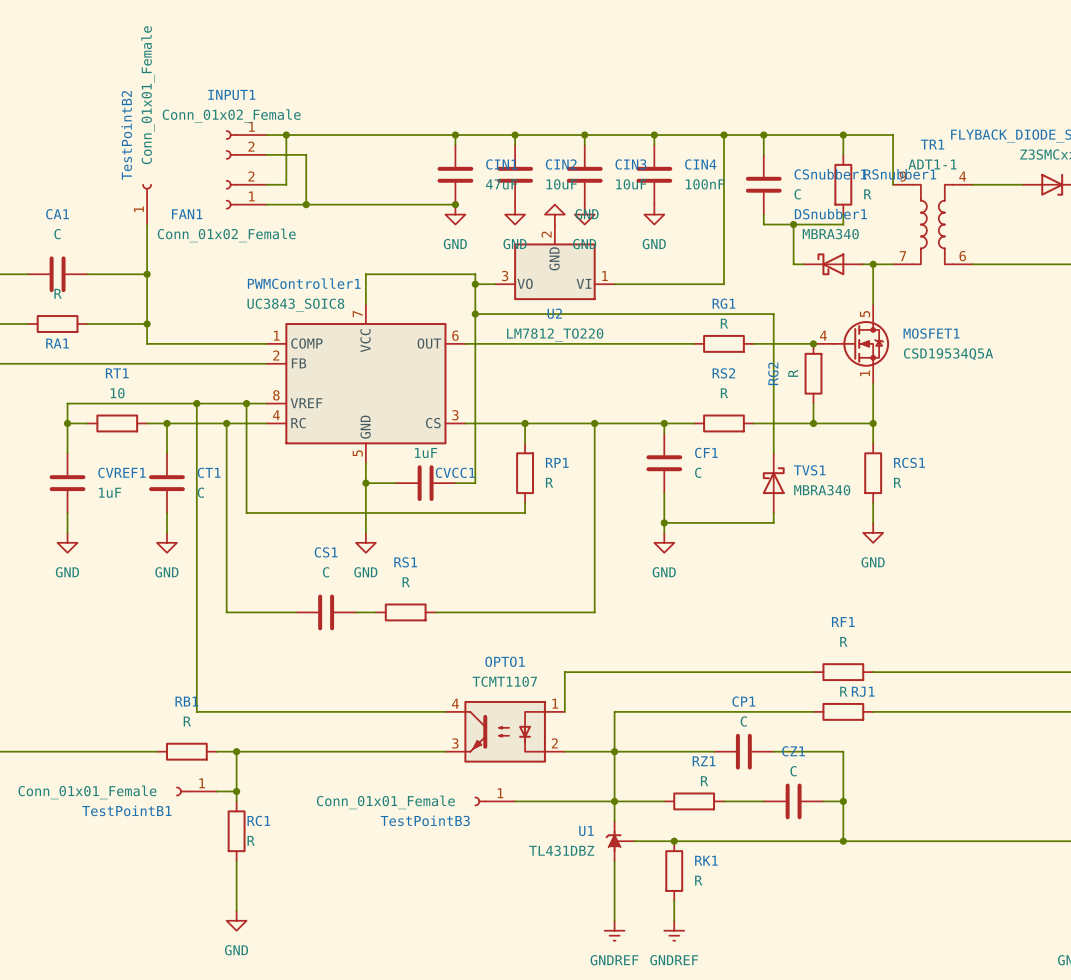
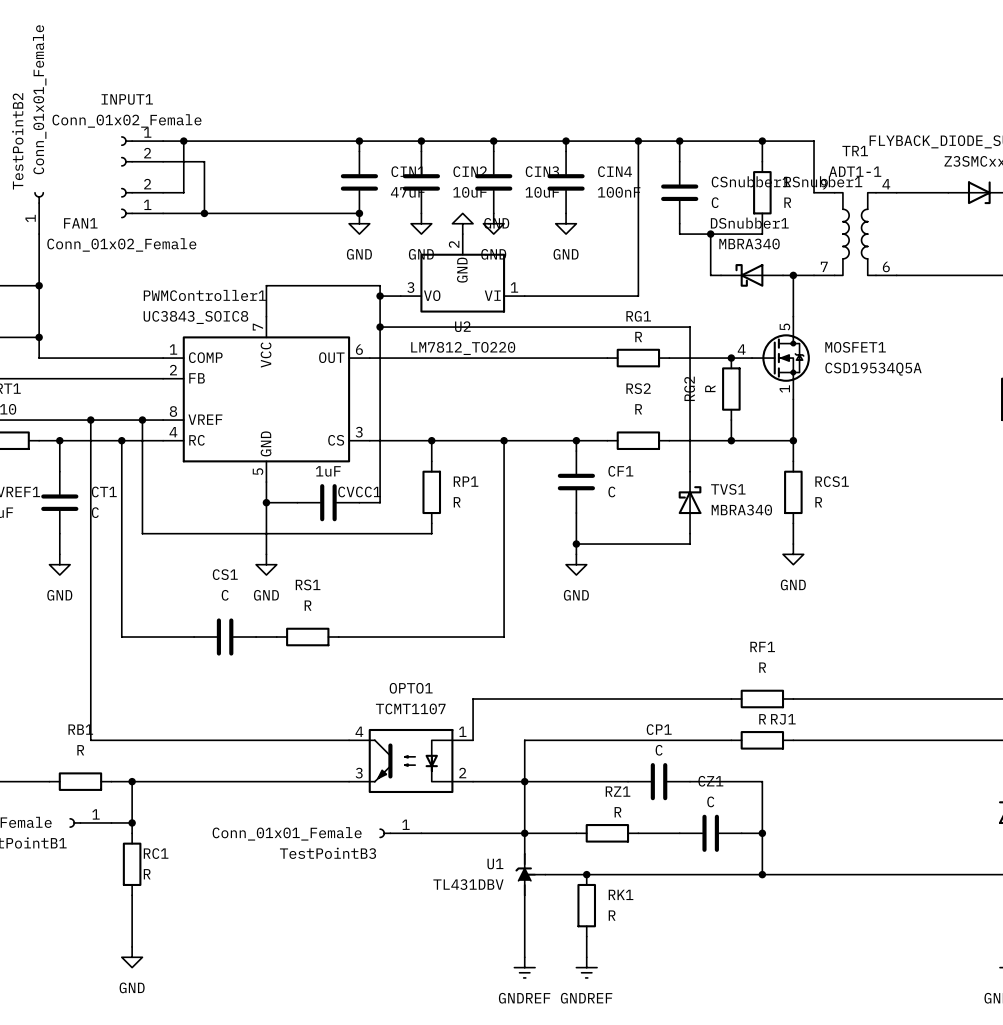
U1 symbol: [605, 821, 635, 862] -> [515, 853, 546, 896]
U1 value: TL431DBZ (561, 850) -> TL431DBV (468, 884)

